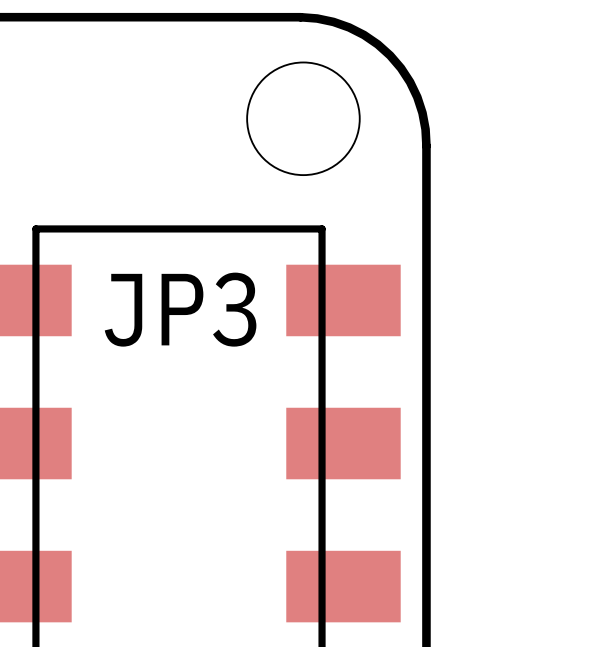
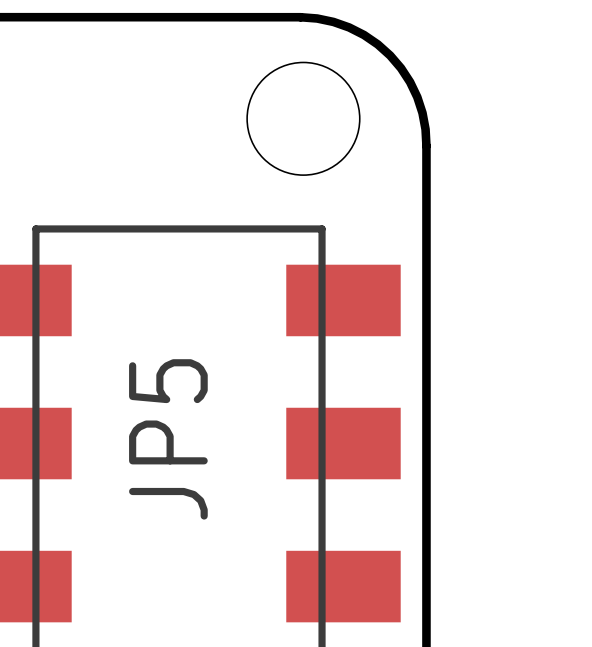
JP3 name: JP3 (180, 309) -> JP5 (168, 439)

